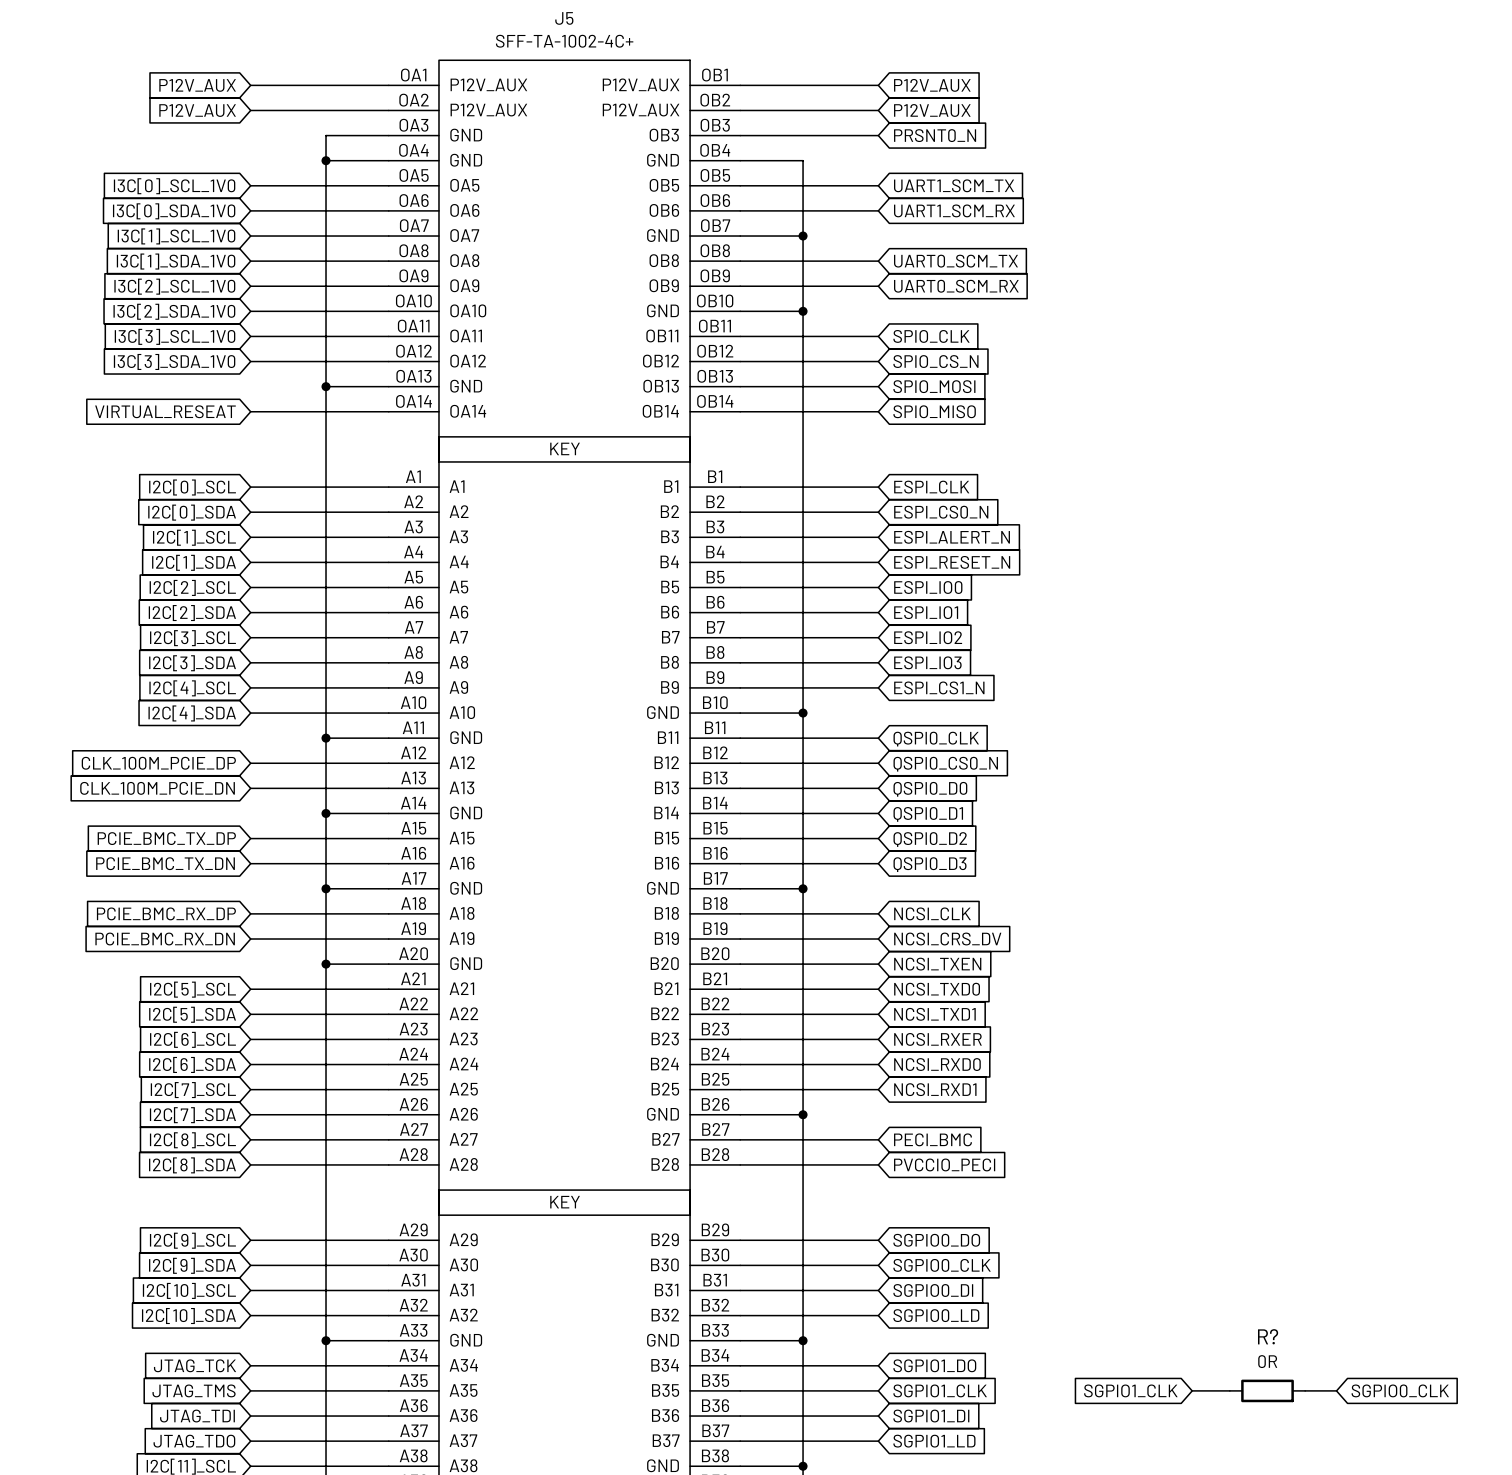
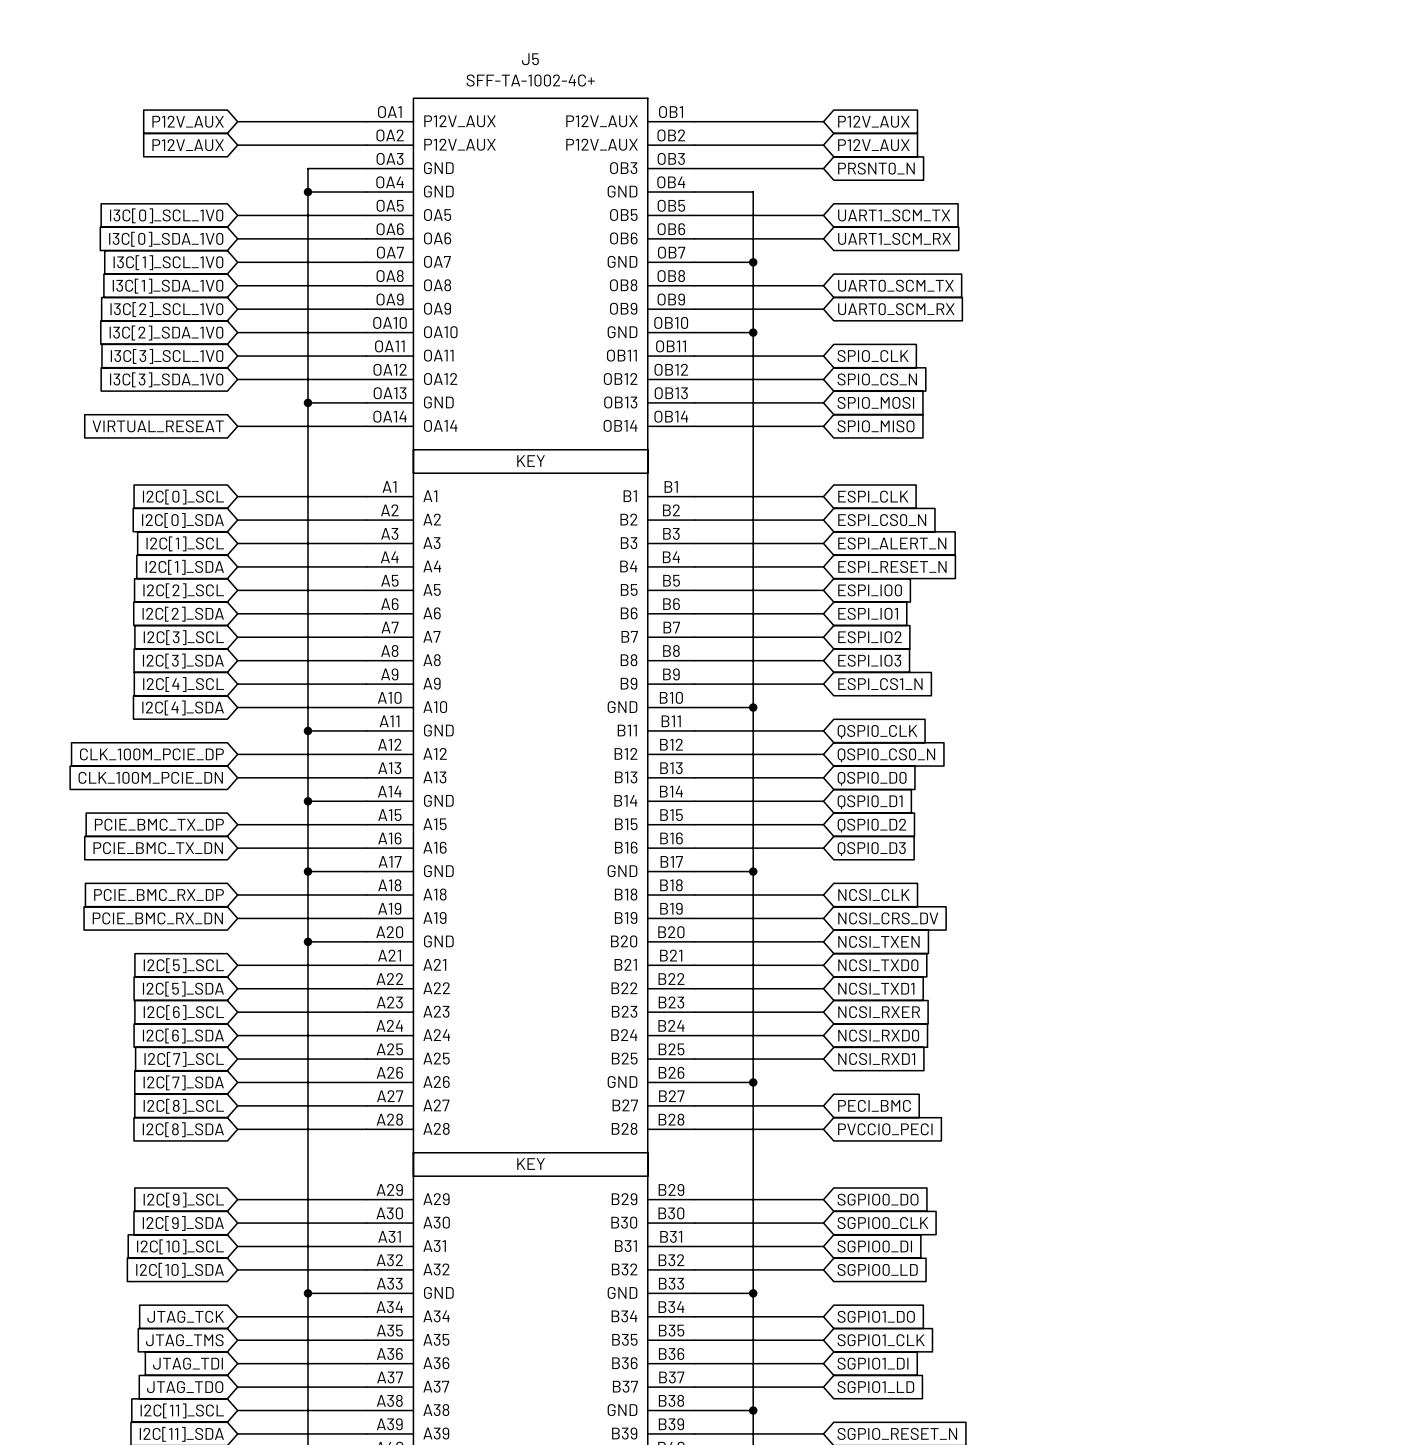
global label: SGPIO1_CLK (1130, 1390) -> none
wire: (1192, 1390) (1229, 1390) -> none
R?: (1267, 1390) -> none
wire: (1305, 1390) (1336, 1390) -> none
global label: SGPIO0_CLK (1400, 1390) -> none

